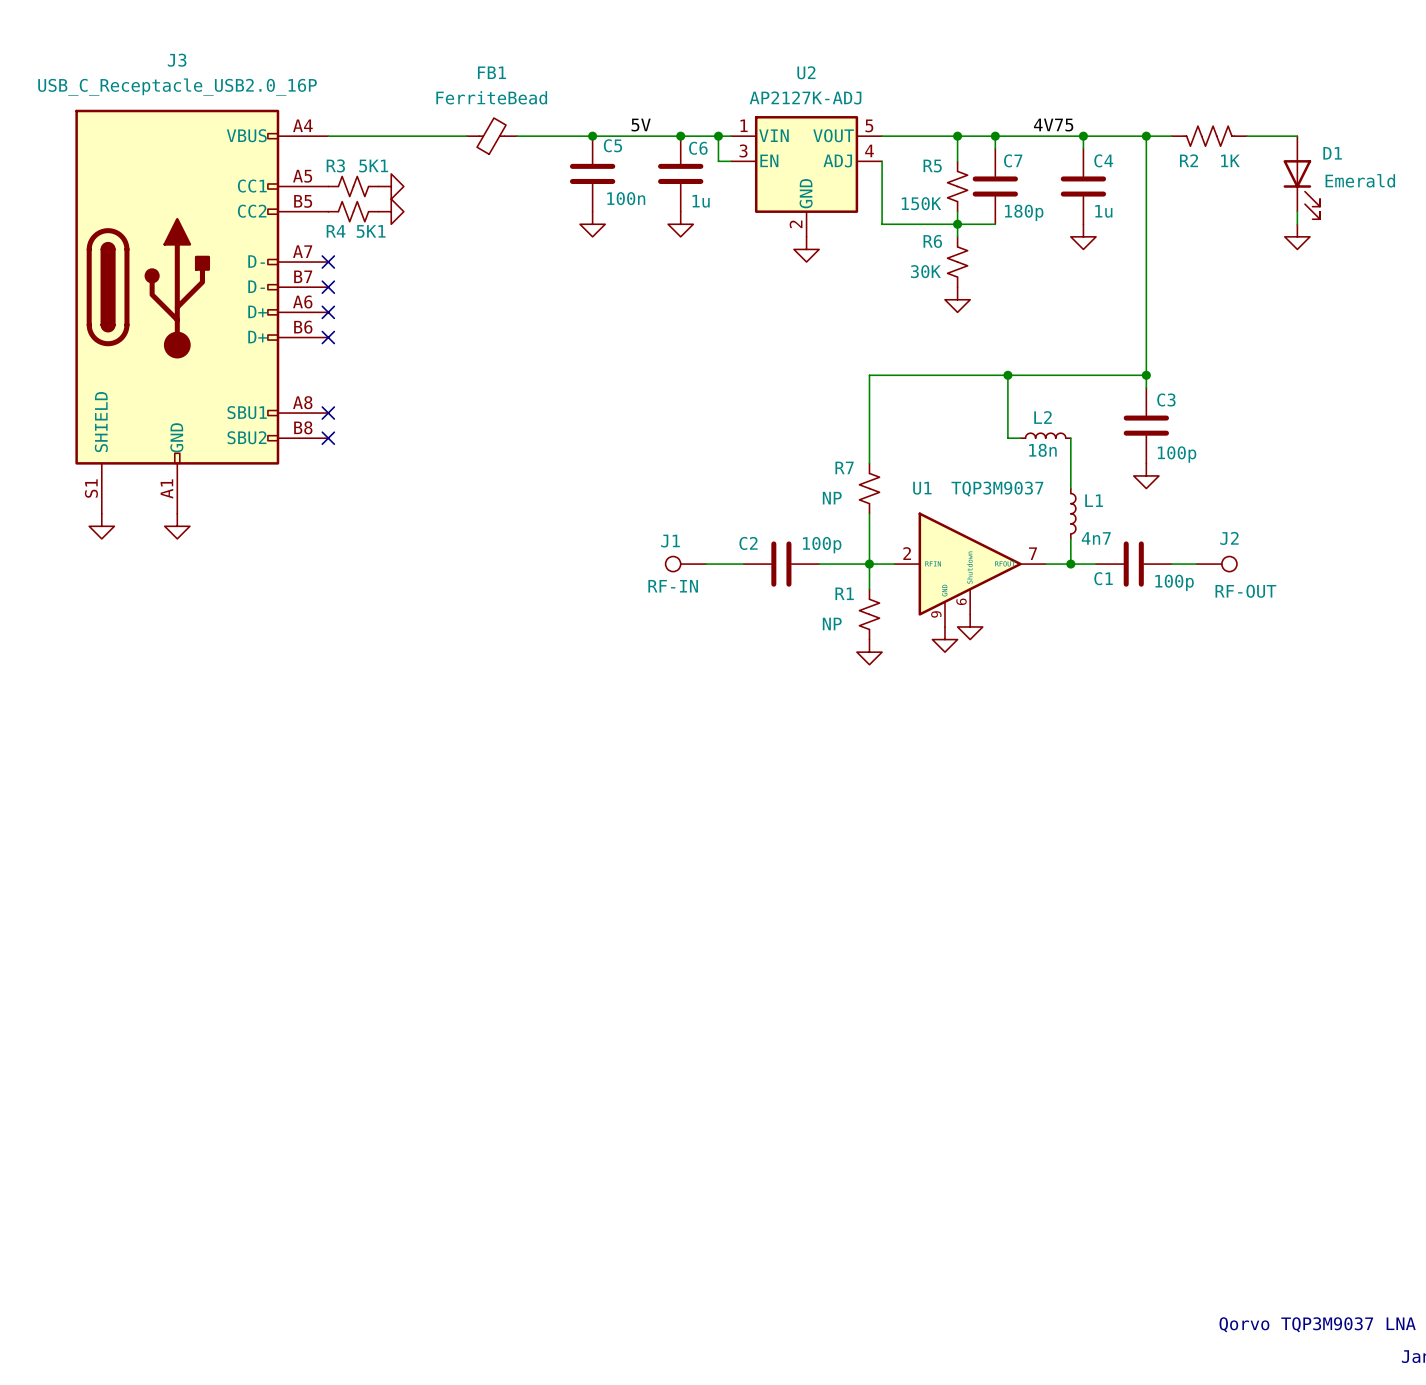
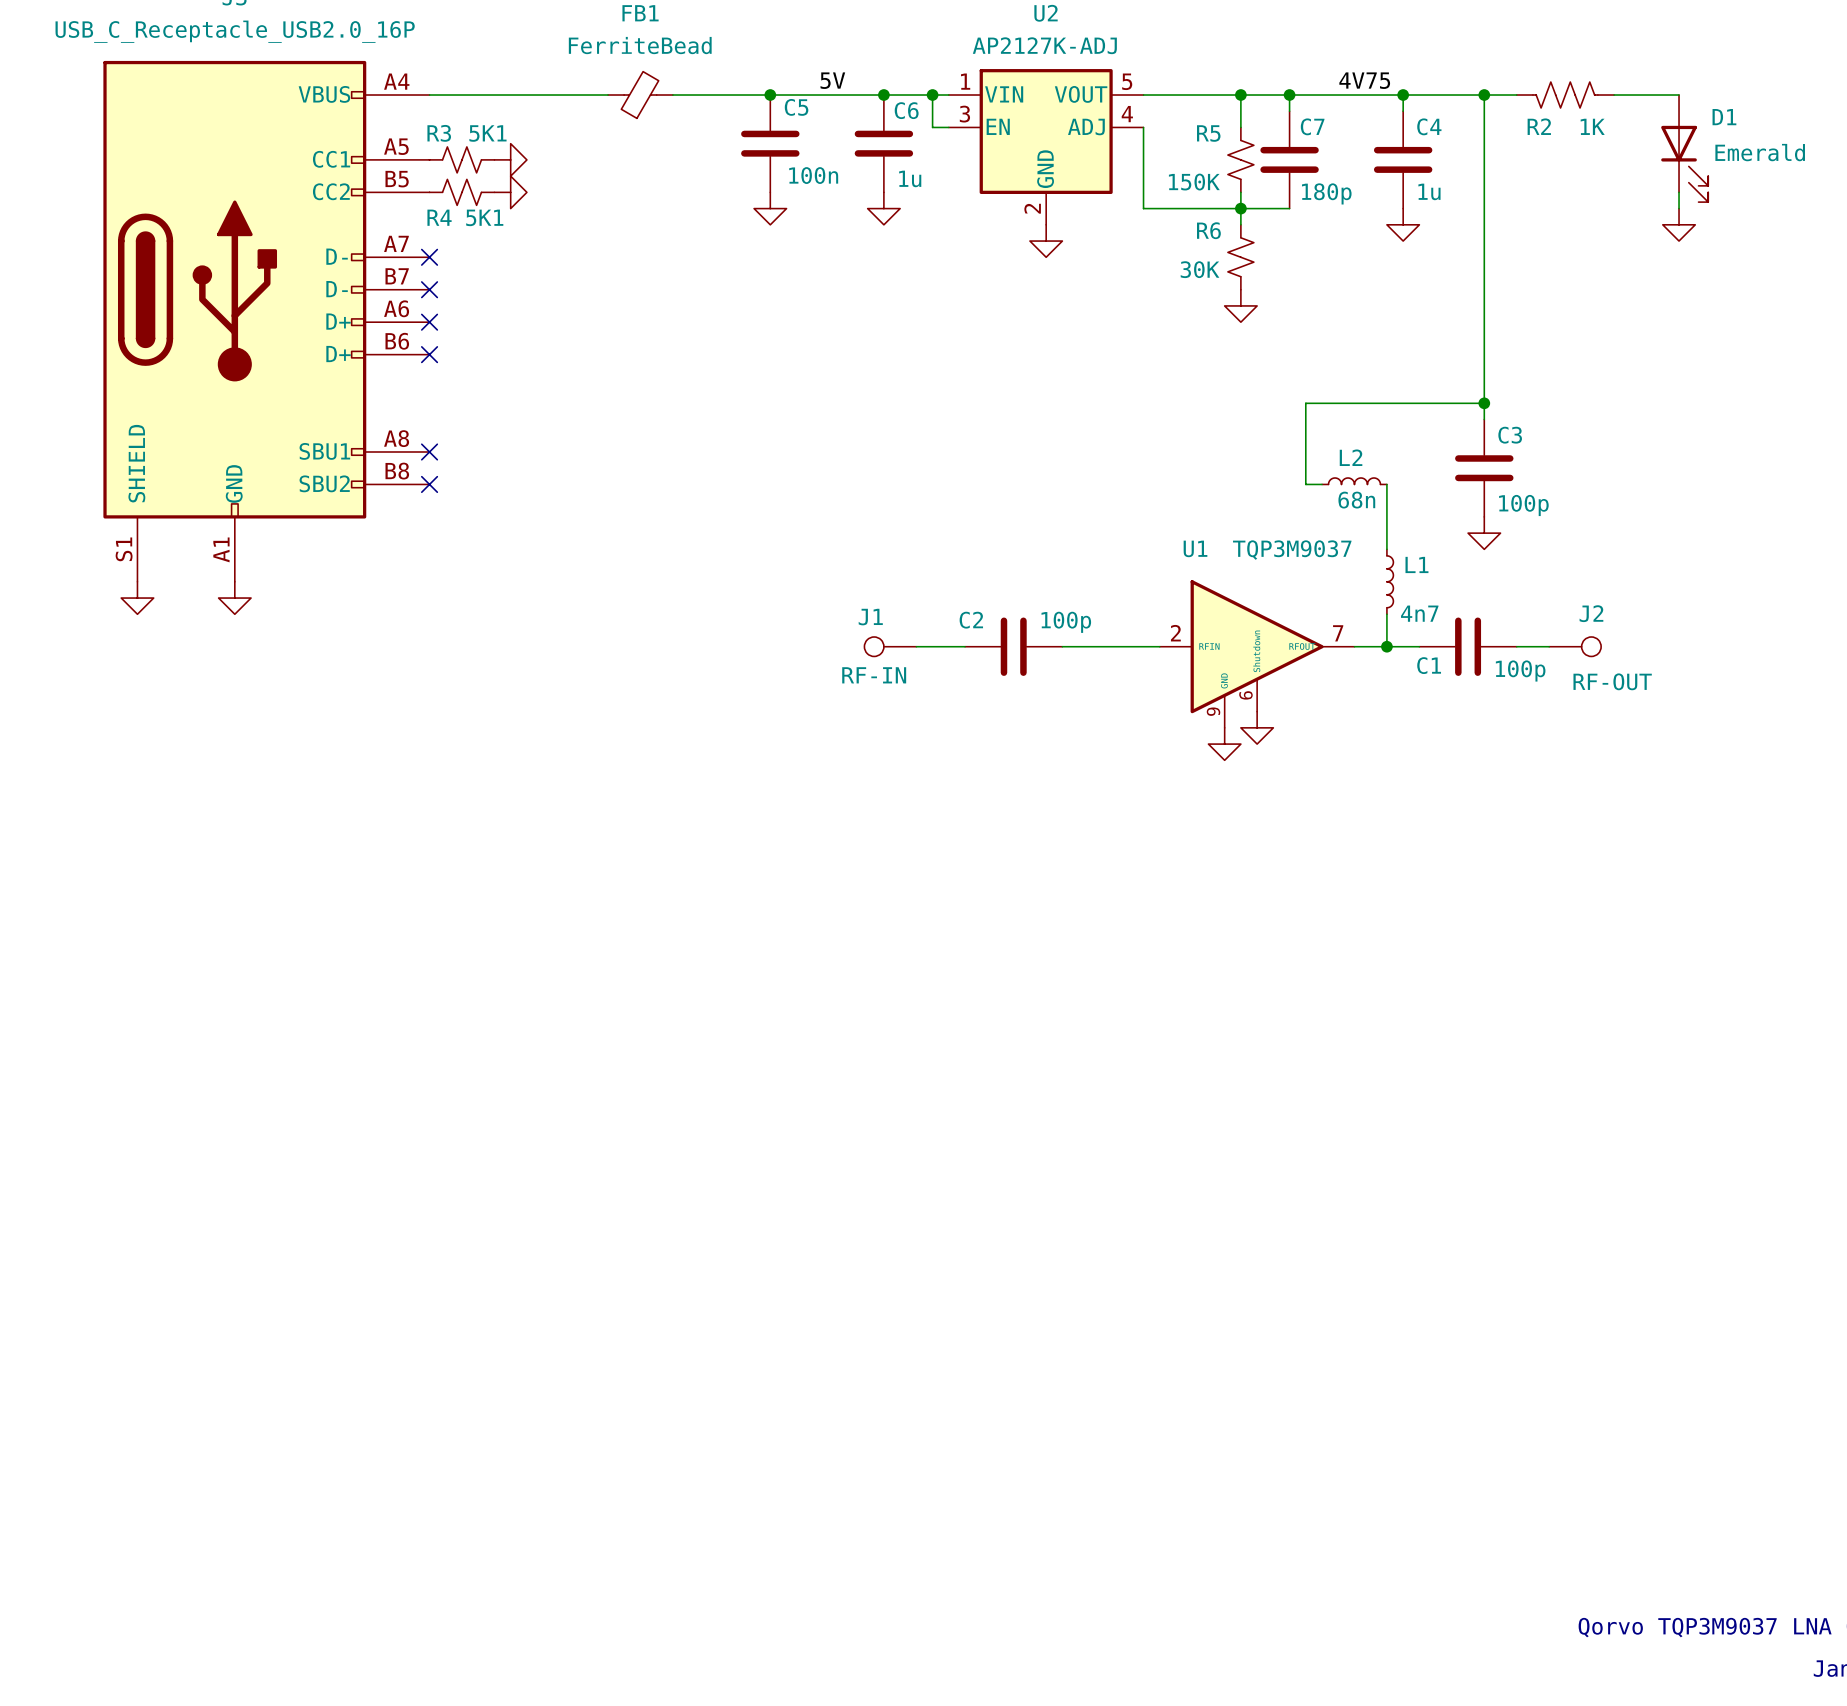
wire: (1007, 375) (869, 375) (869, 463) -> none
junction: (1007, 375) -> none
L2 value: 18n (1042, 450) -> 68n (1356, 500)
R7: NP (869, 488) -> none
wire: (869, 513) (869, 589) -> none
junction: (869, 564) -> none
R1: NP (869, 614) -> none
power symbol: (869, 652) -> none

